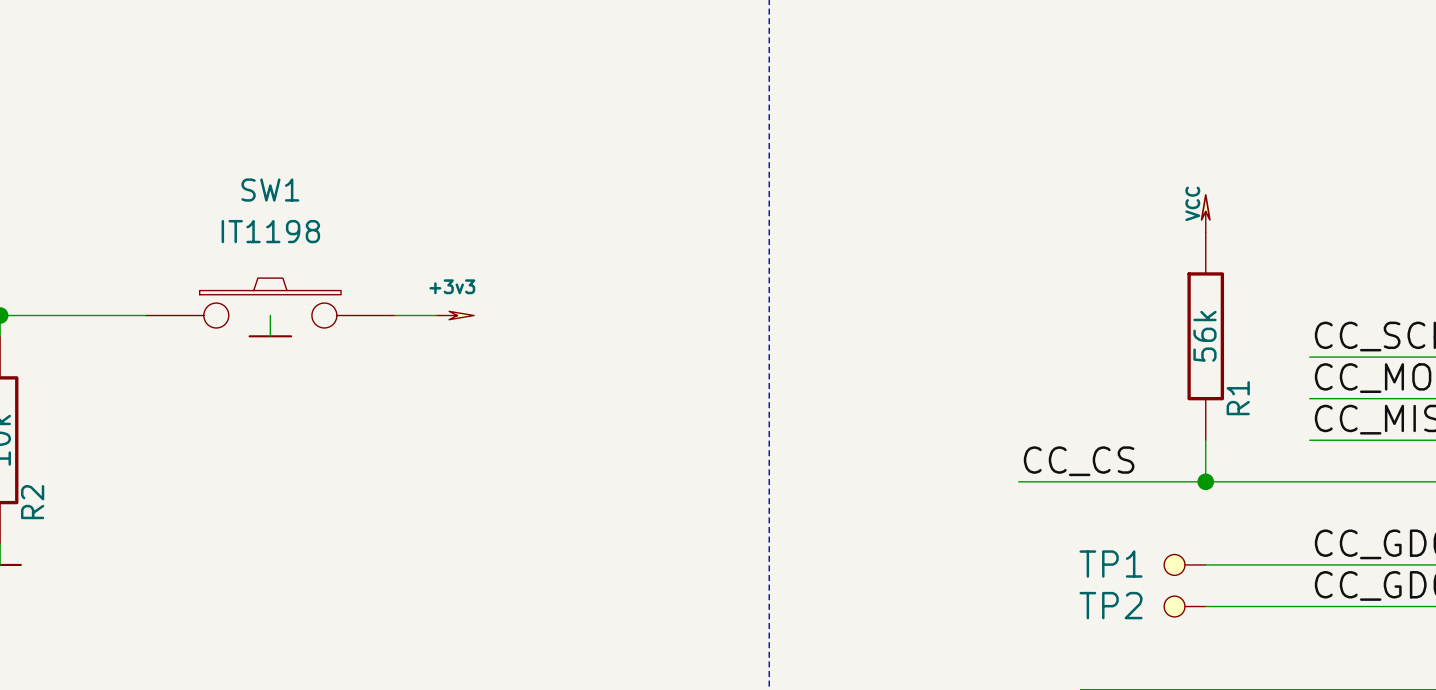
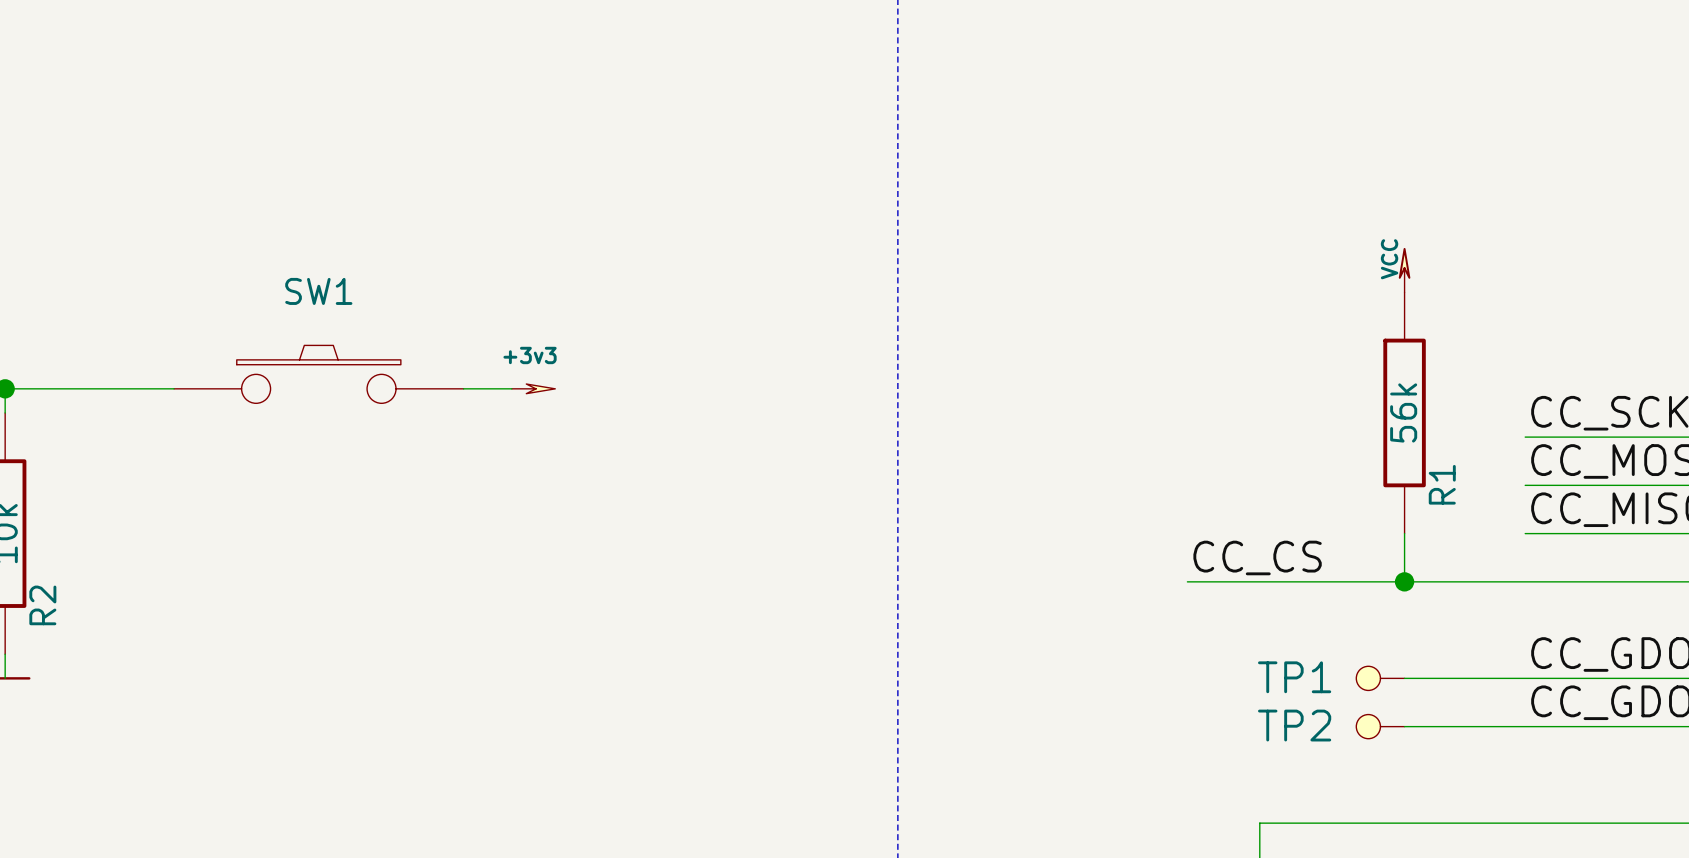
SW1 name position: SW1 (270, 190) -> SW1 (318, 291)
SW1 value: IT1198 (270, 231) -> none
wire: (270, 315) (270, 336) -> none
power symbol: (270, 336) -> none

